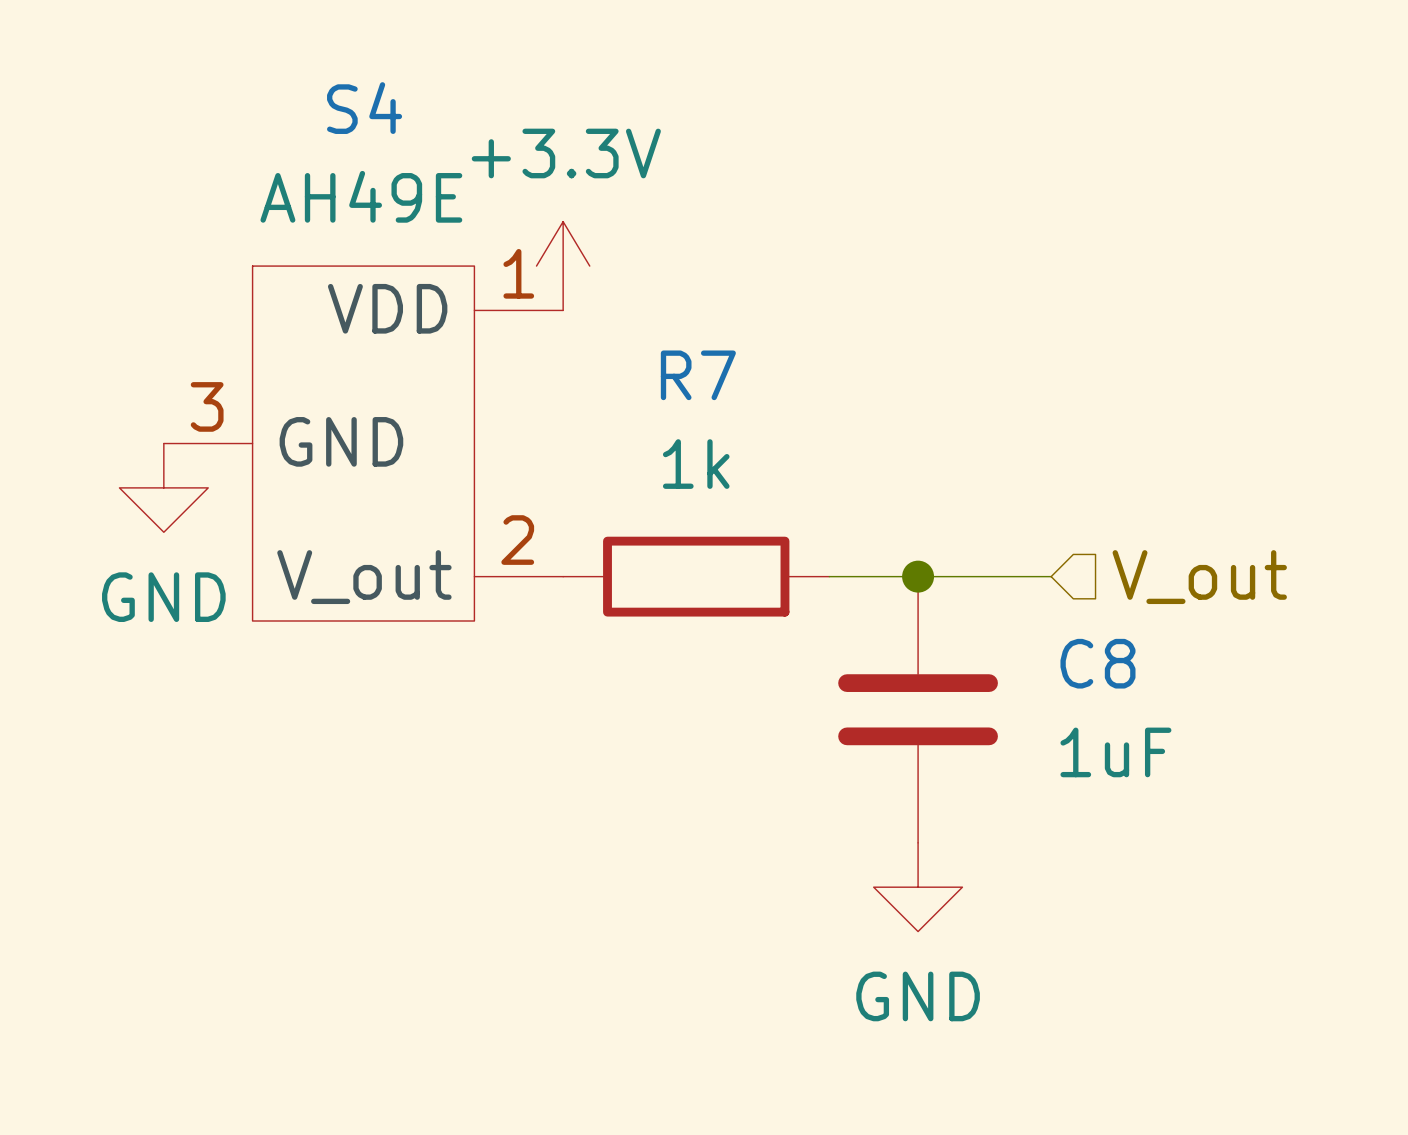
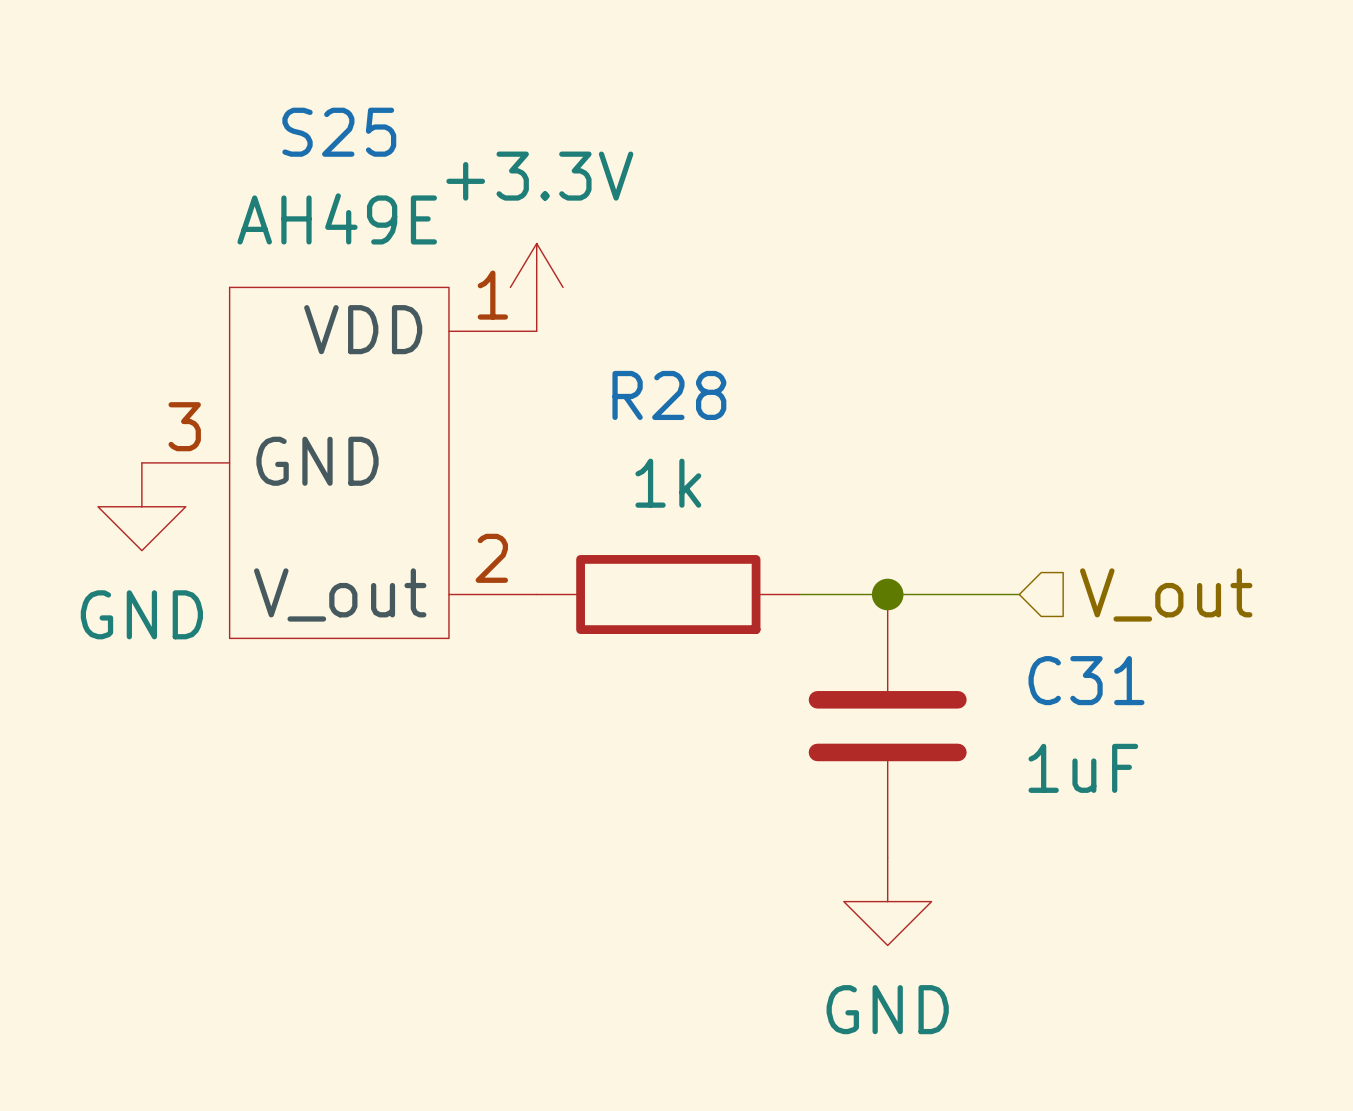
S4 name: S4 (364, 108) -> S25 (339, 132)
R7 name: R7 (698, 375) -> R28 (669, 395)
C8 name: C8 (1097, 663) -> C31 (1086, 680)

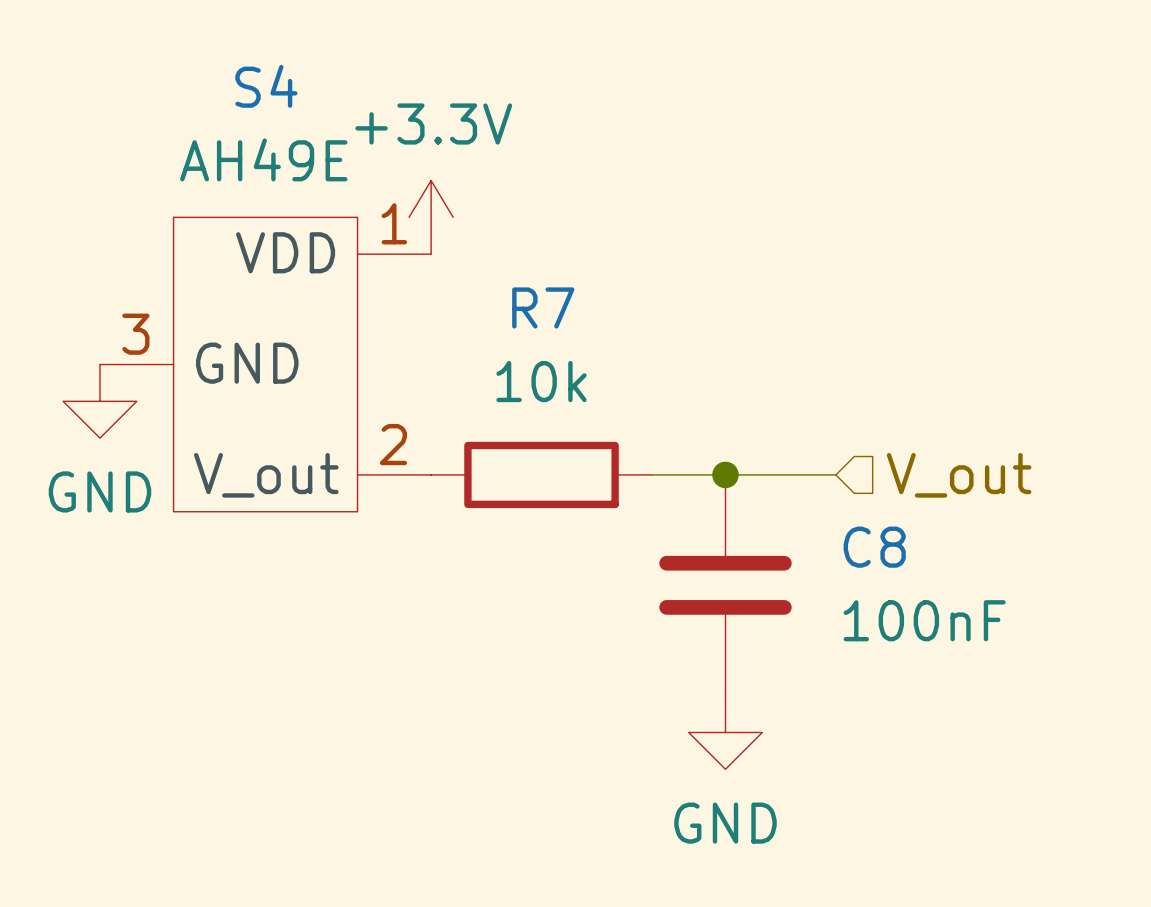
S25 name: S25 (339, 132) -> S4 (266, 86)
R28 name: R28 (669, 395) -> R7 (543, 307)
R28 value: 1k (668, 483) -> 10k (541, 381)
C31 name: C31 (1086, 680) -> C8 (874, 547)
C31 value: 1uF (1083, 768) -> 100nF (924, 620)

